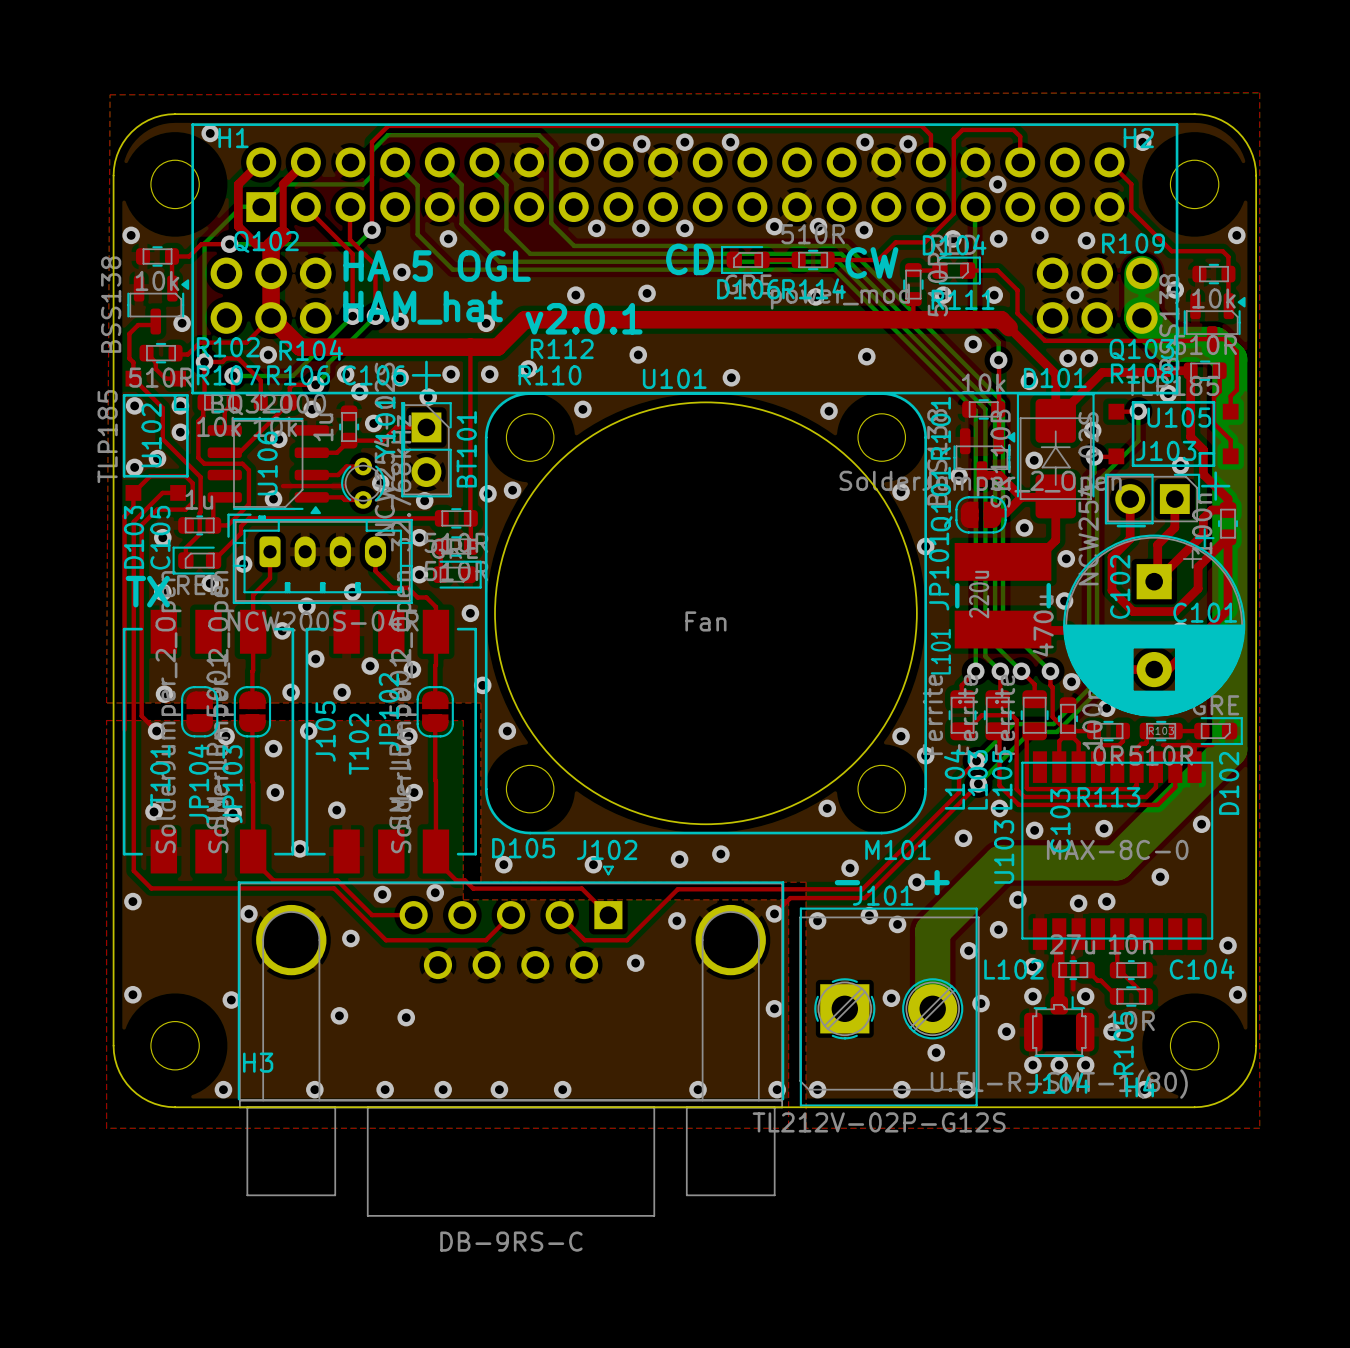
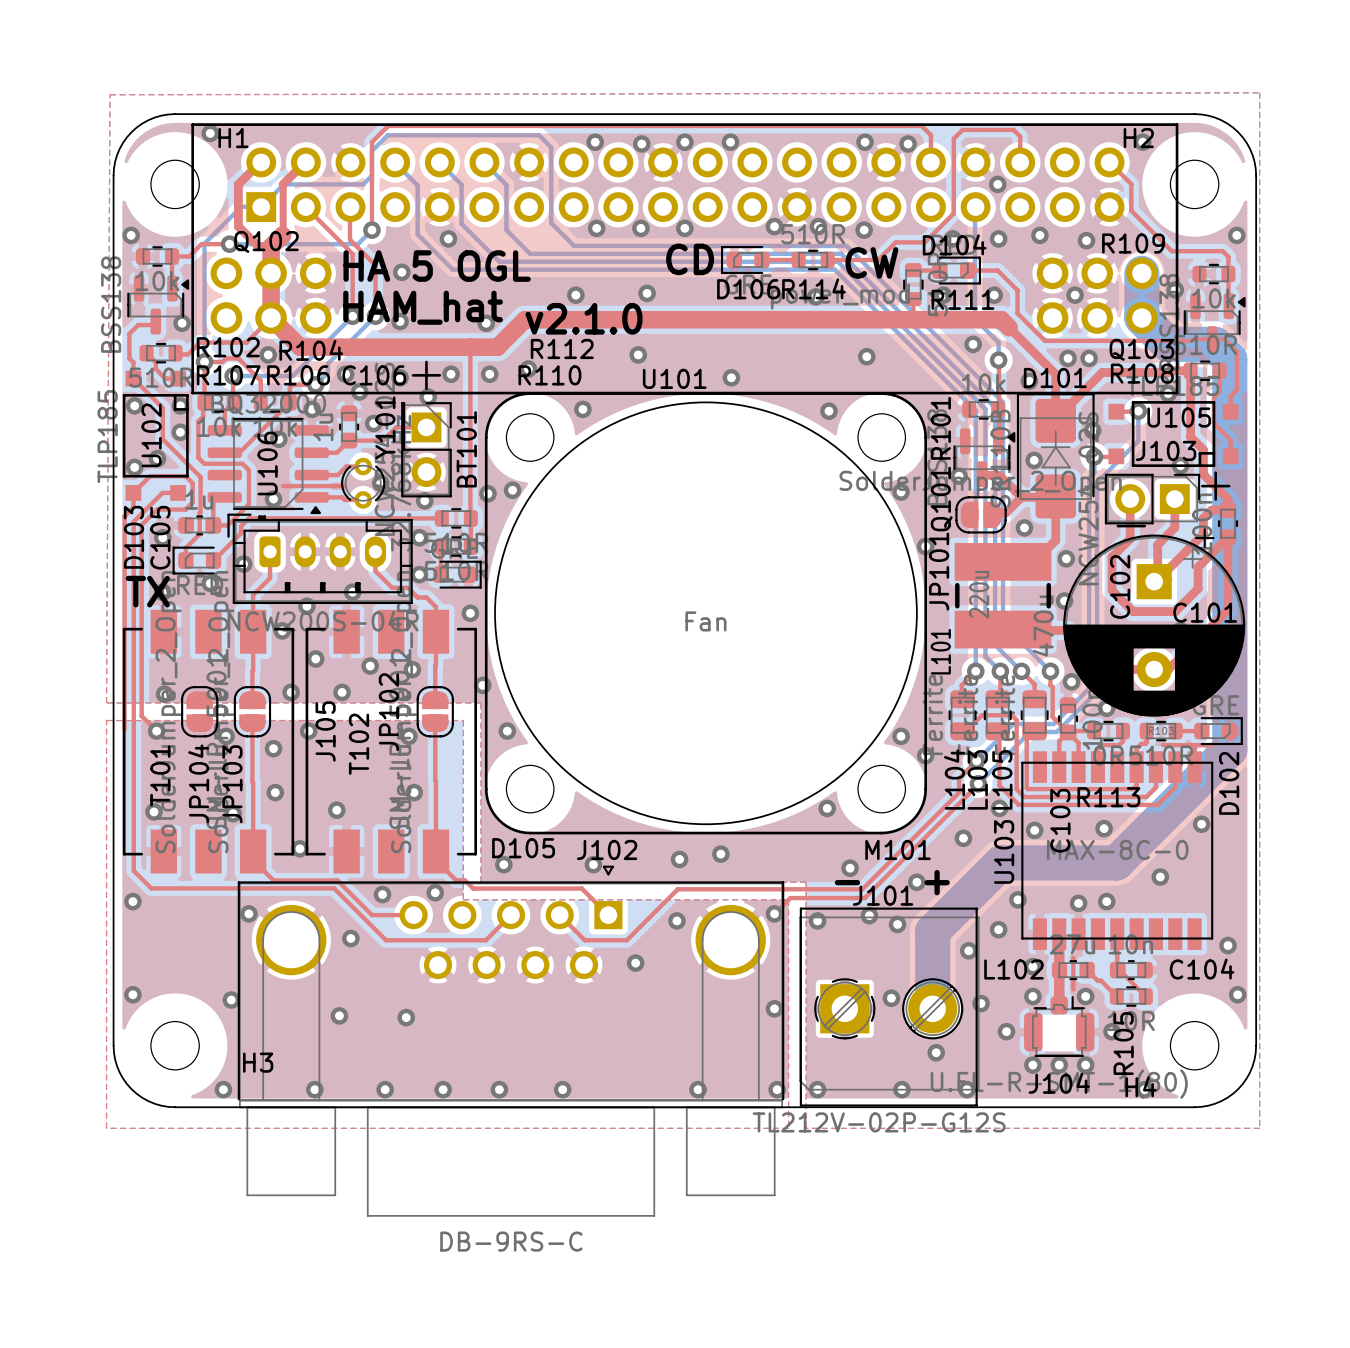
text: v2.0.1 (584, 318) -> v2.1.0 (584, 318)

